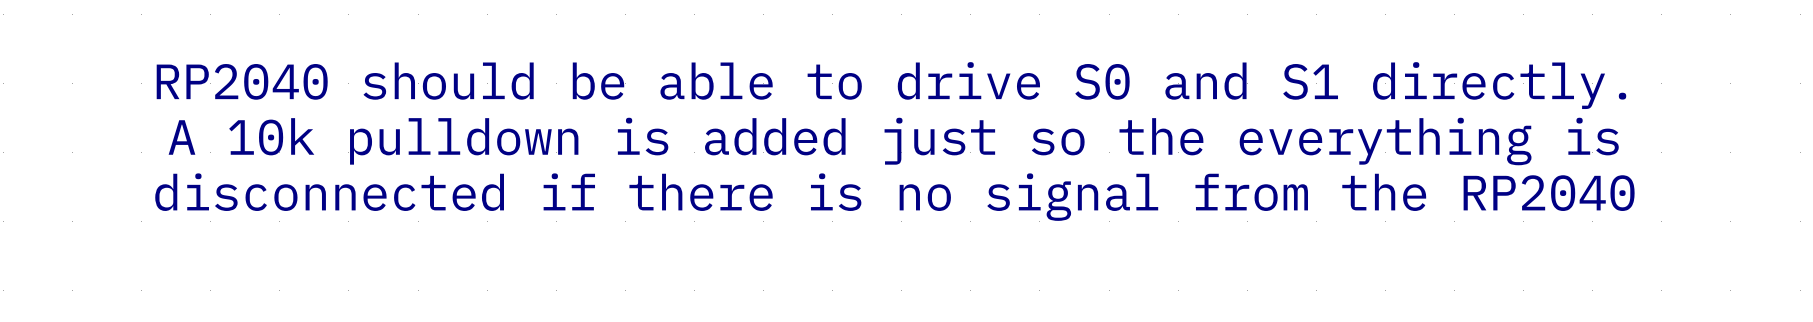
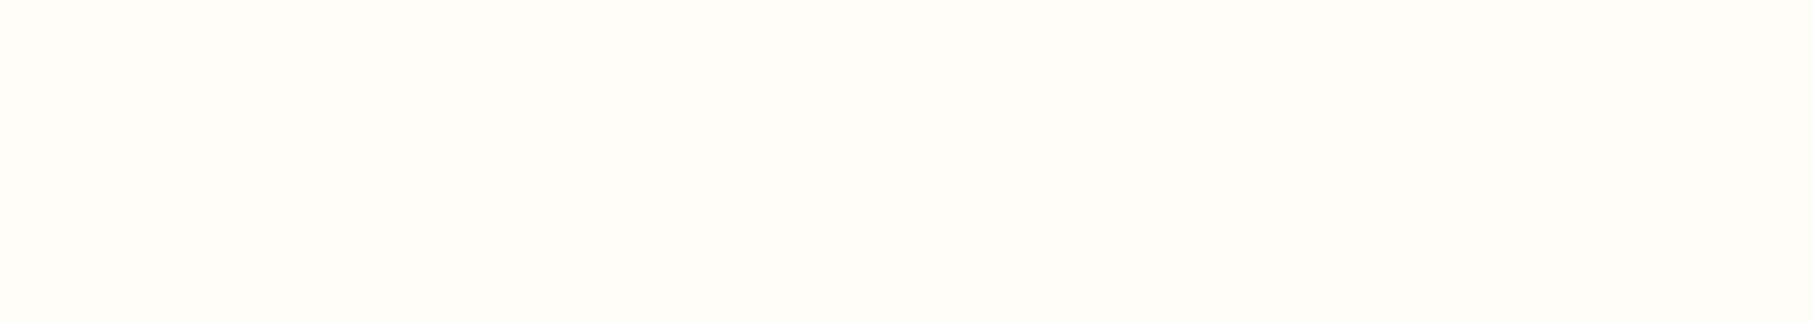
text: RP2040 should be able to drive S0 and S1 directly. (891, 85) -> none
text: A 10k pulldown is added just so the everything is (893, 141) -> none
text: disconnected if there is no signal from the RP2040 (894, 197) -> none

